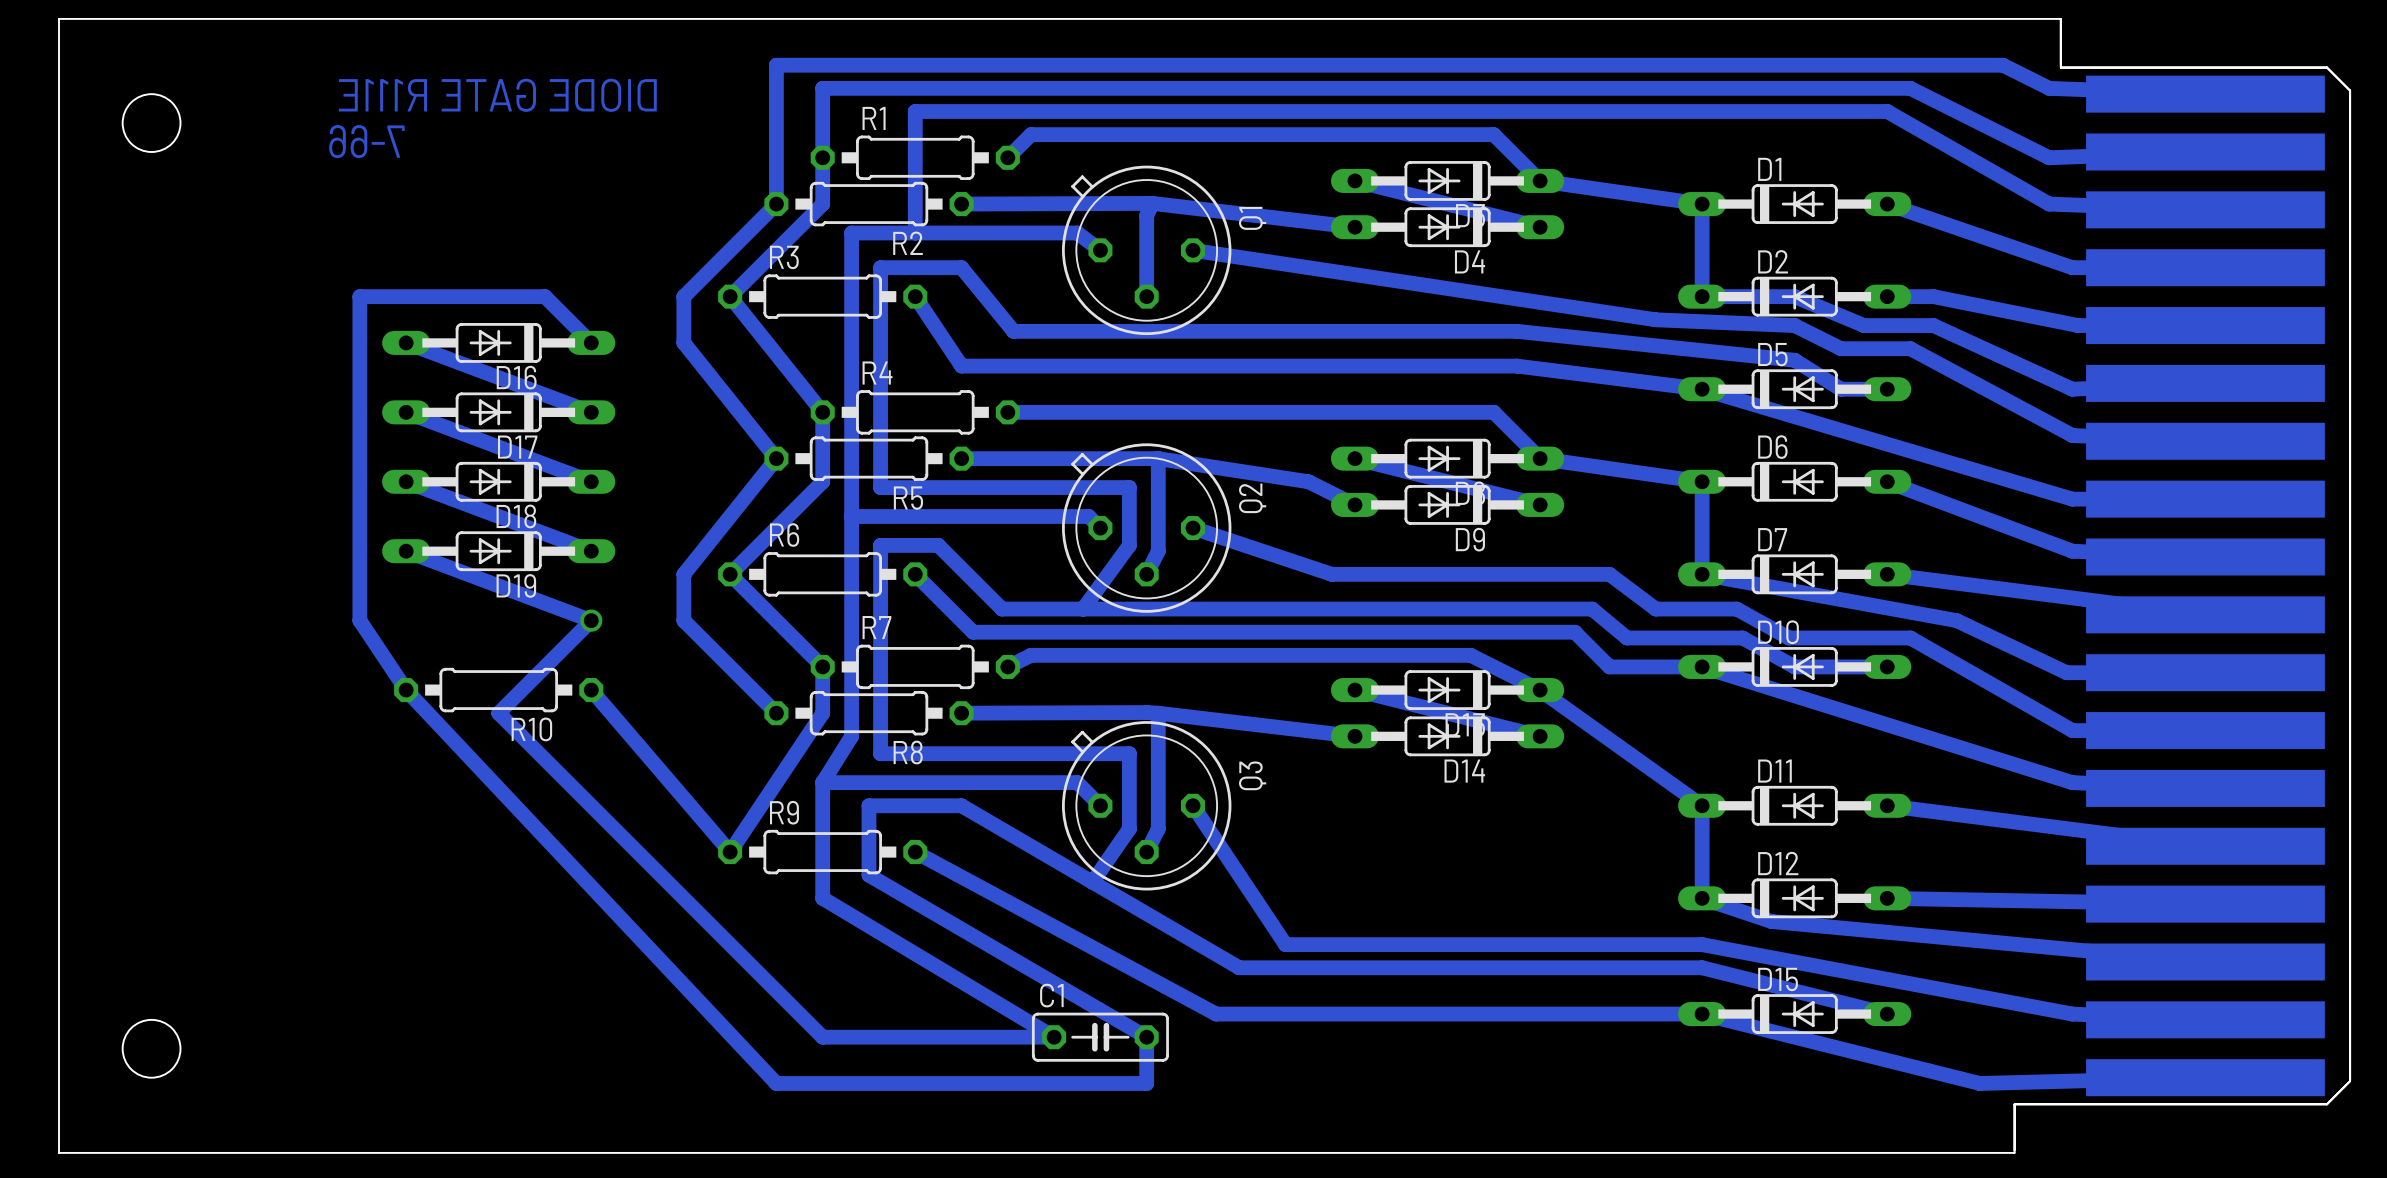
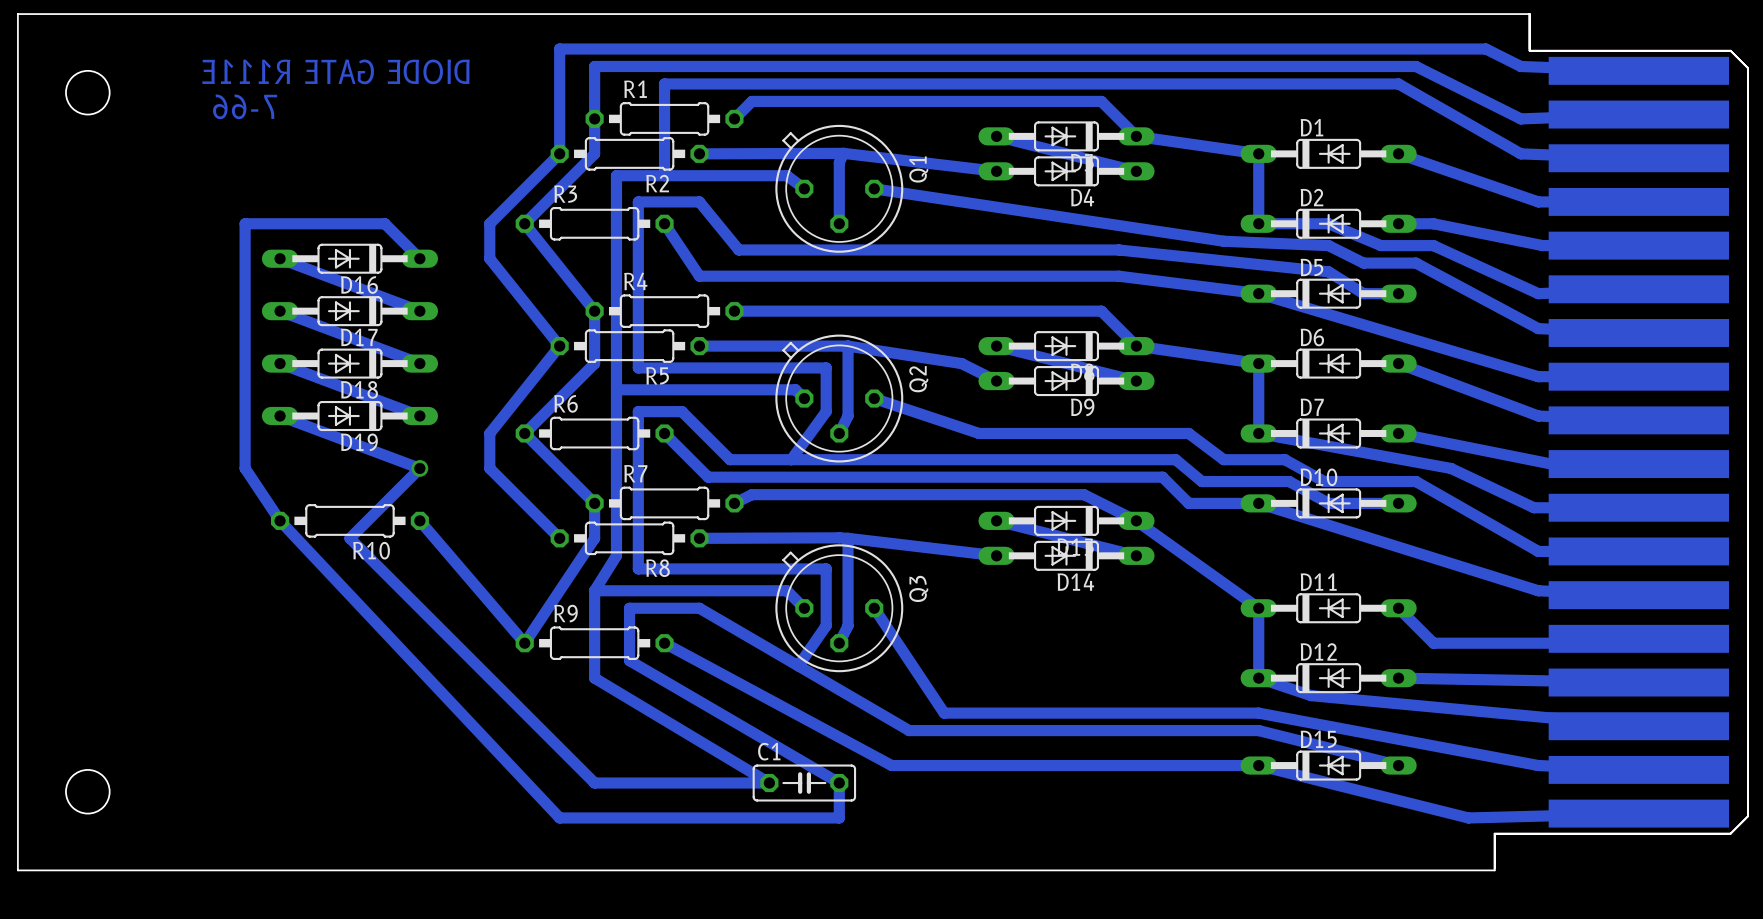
bottom track: (1887, 574) (2205, 614) -> (1398, 433) (1573, 468) (1638, 464)
bottom track: (1887, 805) (2205, 846) -> (1398, 608) (1433, 643) (1573, 643) (1638, 638)

